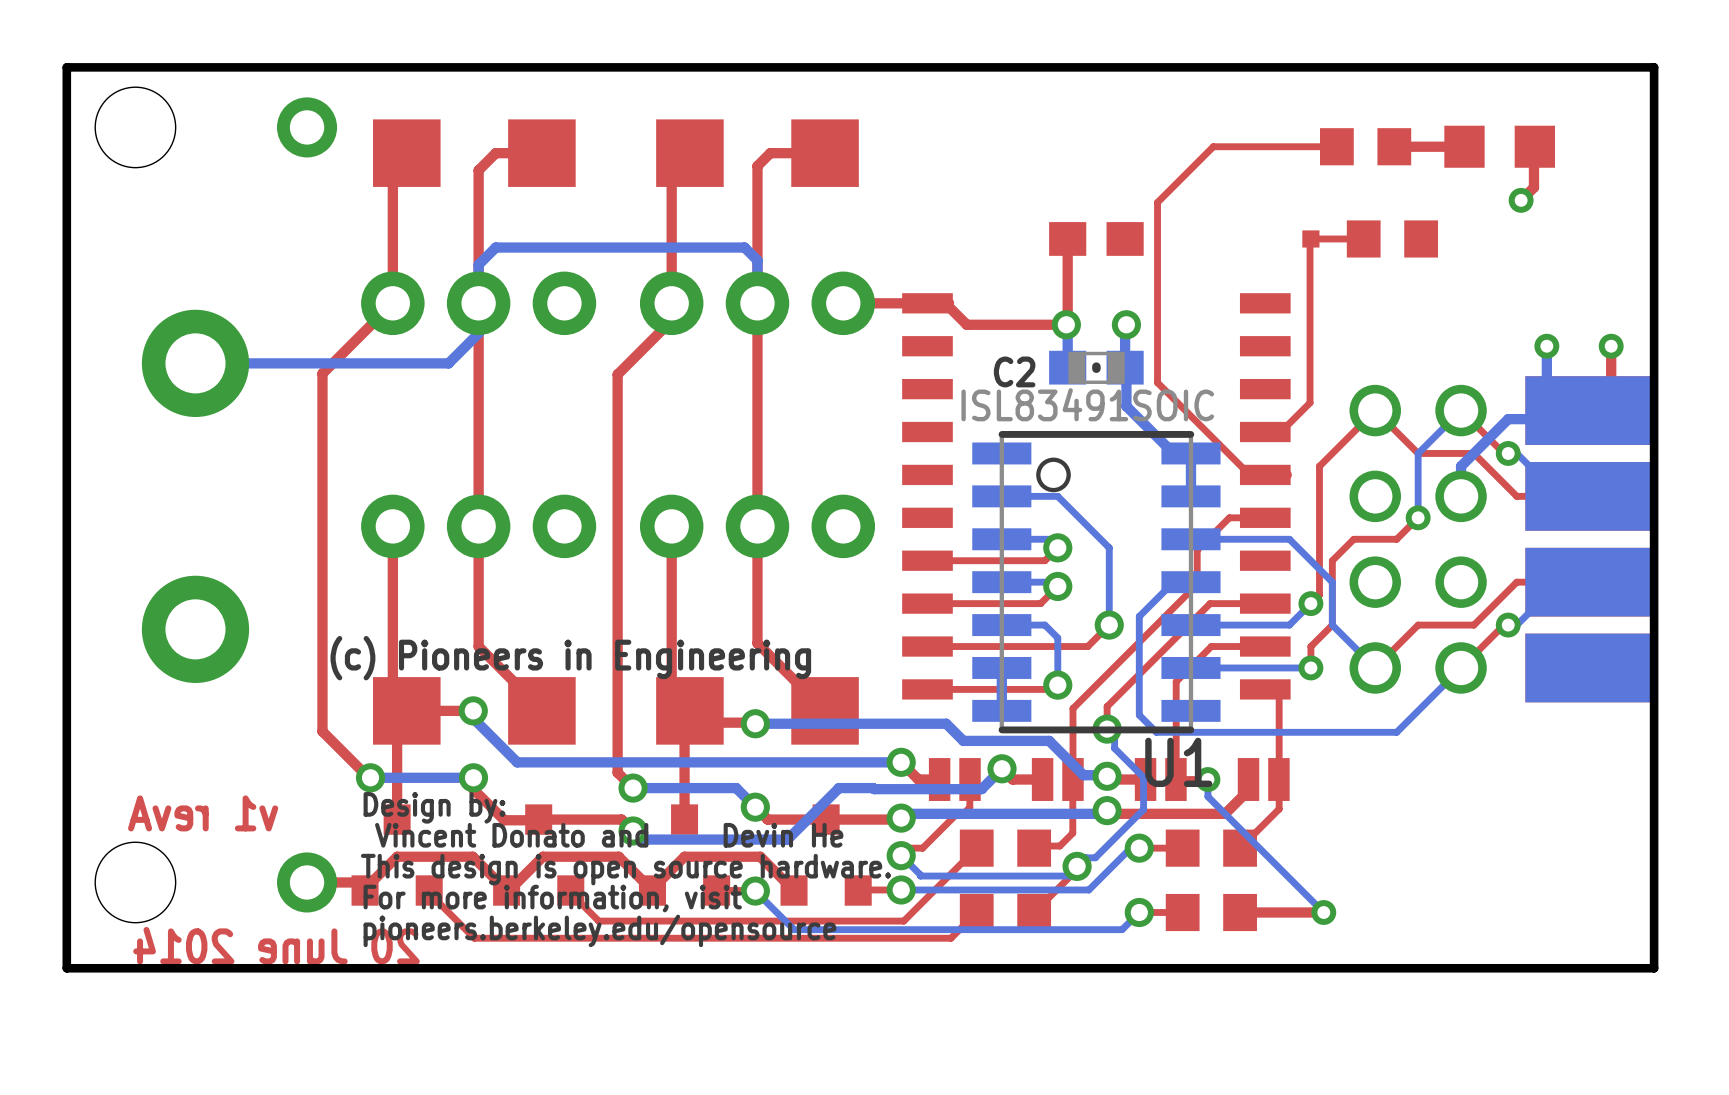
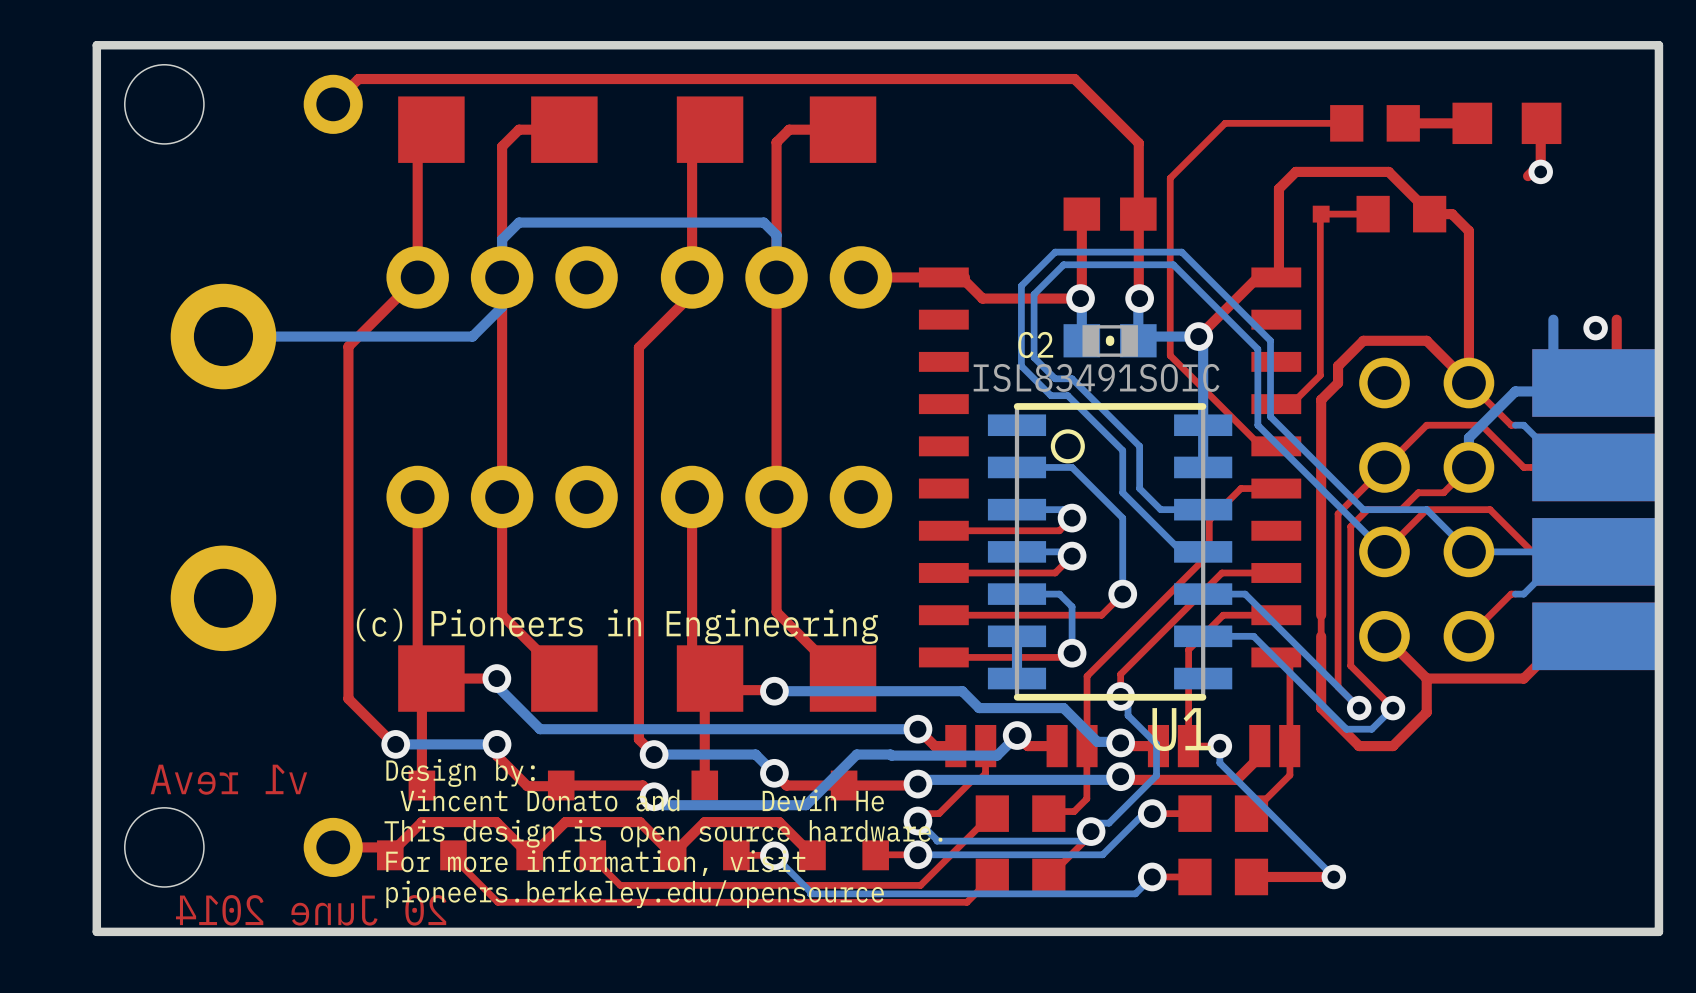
top track: none -> (333, 104) (358, 79) (1074, 79) (1138, 143) (1138, 297)
via position: (1521, 200) -> (1540, 171)
top track: none -> (1429, 212) (1388, 171) (1295, 171) (1278, 188) (1278, 274) (1276, 277) (1257, 277) (1198, 336)
top track: none -> (1429, 214) (1452, 214) (1468, 231) (1468, 383) (1426, 340) (1363, 340) (1338, 366) (1338, 383) (1321, 399) (1321, 615)
via: (1546, 346) -> none
via position: (1611, 346) -> (1595, 328)
via: none -> (1198, 336)
bottom track: (1125, 367) (1126, 406) (1173, 453) (1190, 453) -> (1138, 340) (1142, 336) (1198, 336) (1203, 340) (1203, 425)
bottom track: (1461, 410) (1418, 453) (1418, 517) -> none
top track: (1418, 453) (1375, 410) (1319, 466) (1319, 595) (1310, 603) -> (1426, 425) (1338, 513) (1338, 686) (1359, 708)
via: (1508, 453) -> none
top track: (1418, 517) (1396, 539) (1392, 539) -> (1468, 467) (1443, 492) (1418, 492) (1401, 509)
via: (1418, 517) -> none
bottom track: (1190, 539) (1289, 539) (1332, 582) (1332, 625) (1375, 667) -> (1203, 509) (1160, 509) (1139, 488) (1139, 446) (1072, 378) (1055, 378) (1034, 357) (1034, 294) (1063, 264) (1173, 264) (1257, 349) (1257, 425) (1384, 551)
top track: (1358, 539) (1353, 539) (1332, 560) (1332, 625) (1310, 646) -> (1367, 509) (1350, 526) (1350, 665) (1392, 708)
bottom track: (1173, 582) (1139, 616) (1139, 715) (1156, 732) (1396, 732) (1461, 667) -> (1186, 551) (1181, 551) (1122, 492) (1122, 450) (1067, 395) (1050, 395) (1021, 366) (1021, 285) (1055, 252) (1181, 252) (1270, 340) (1270, 416) (1363, 509) (1426, 509) (1468, 551) (1553, 551)
top track: (1525, 582) (1516, 582) (1473, 625) (1418, 625) (1375, 667) -> (1532, 551) (1490, 509) (1426, 509) (1384, 551)
bottom track: (1310, 603) (1289, 625) (1233, 625) -> (1359, 708) (1245, 594)
via: (1310, 603) -> none
via: (1508, 625) -> none
bottom track: (1310, 667) (1242, 667) -> (1392, 708) (1371, 729) (1346, 729) (1253, 636)
top track: none -> (1321, 636) (1321, 708) (1359, 746) (1392, 746) (1426, 712) (1426, 678)
via: (1310, 667) -> none
top track: none -> (1384, 636) (1426, 678)
top track: none -> (1595, 636) (1566, 636) (1523, 678) (1426, 678)
via: none -> (1359, 708)
via: none -> (1392, 708)

